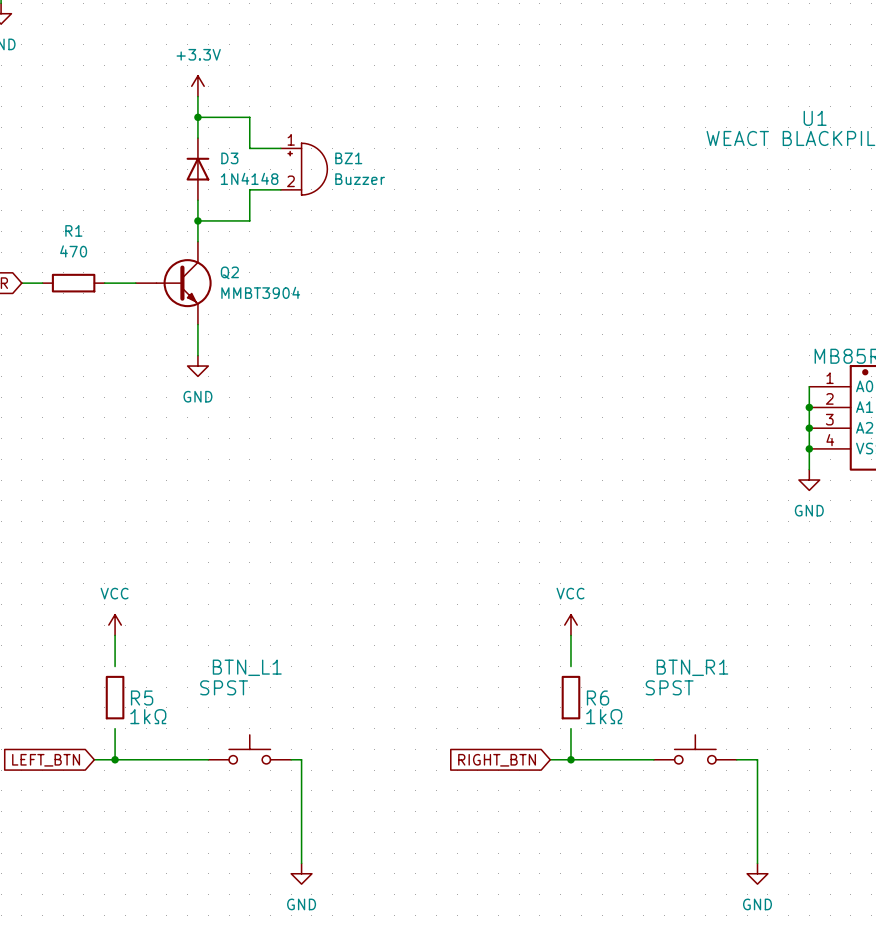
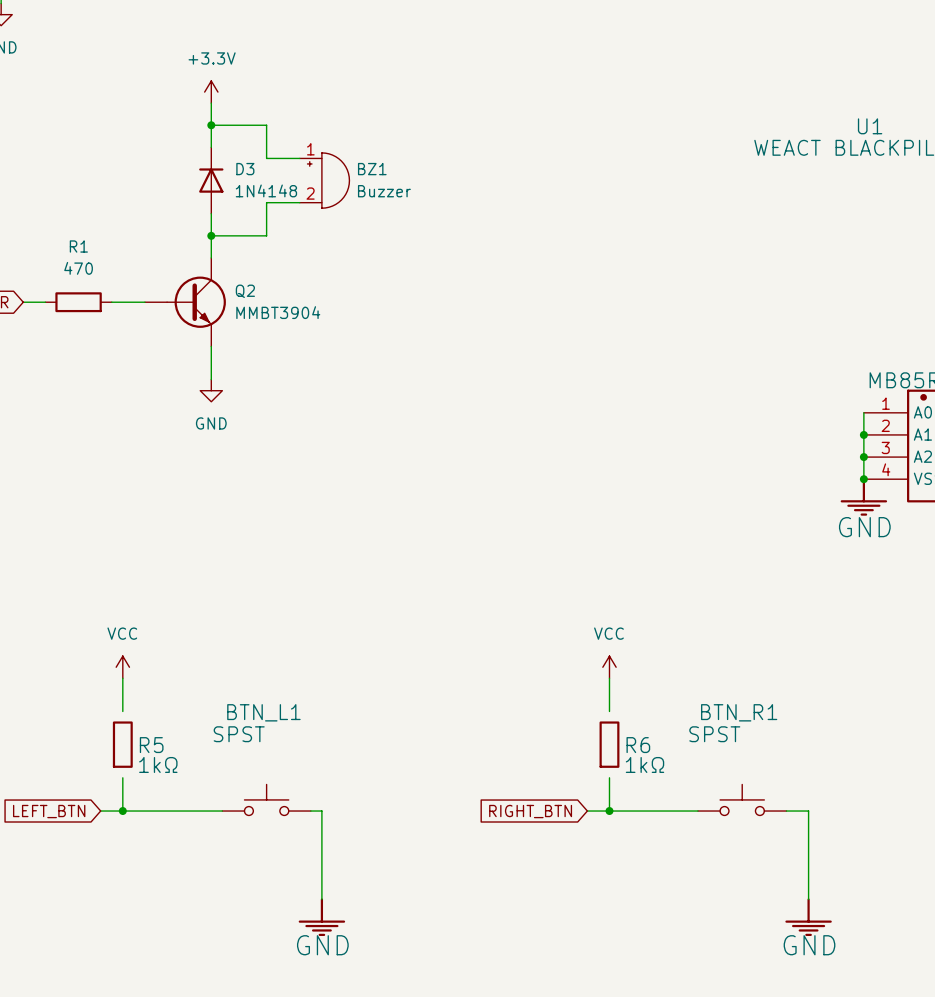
power symbol: none -> GND (863, 496)
power symbol: GND (809, 480) -> none
power symbol: none -> GND (321, 917)
power symbol: none -> GND (808, 917)
power symbol: GND (301, 873) -> none
power symbol: GND (757, 873) -> none

